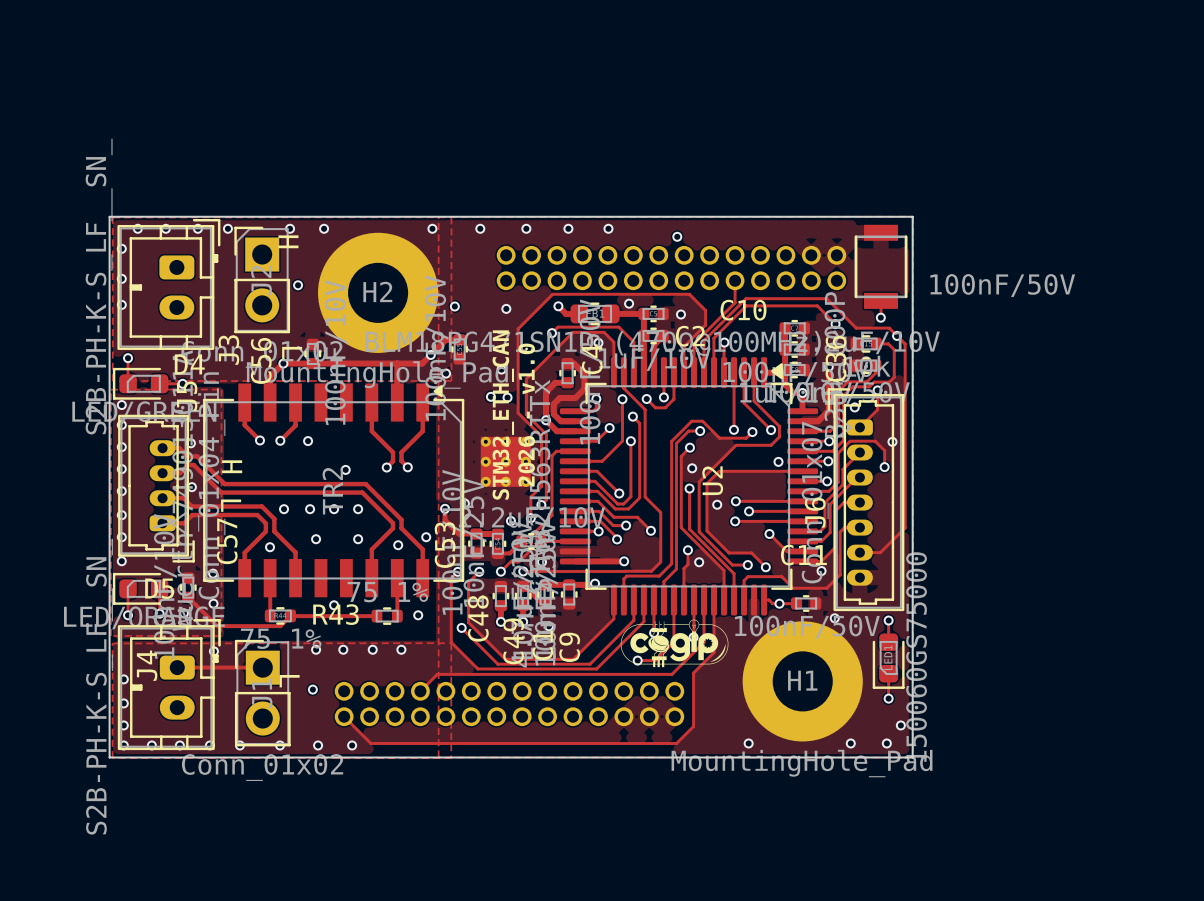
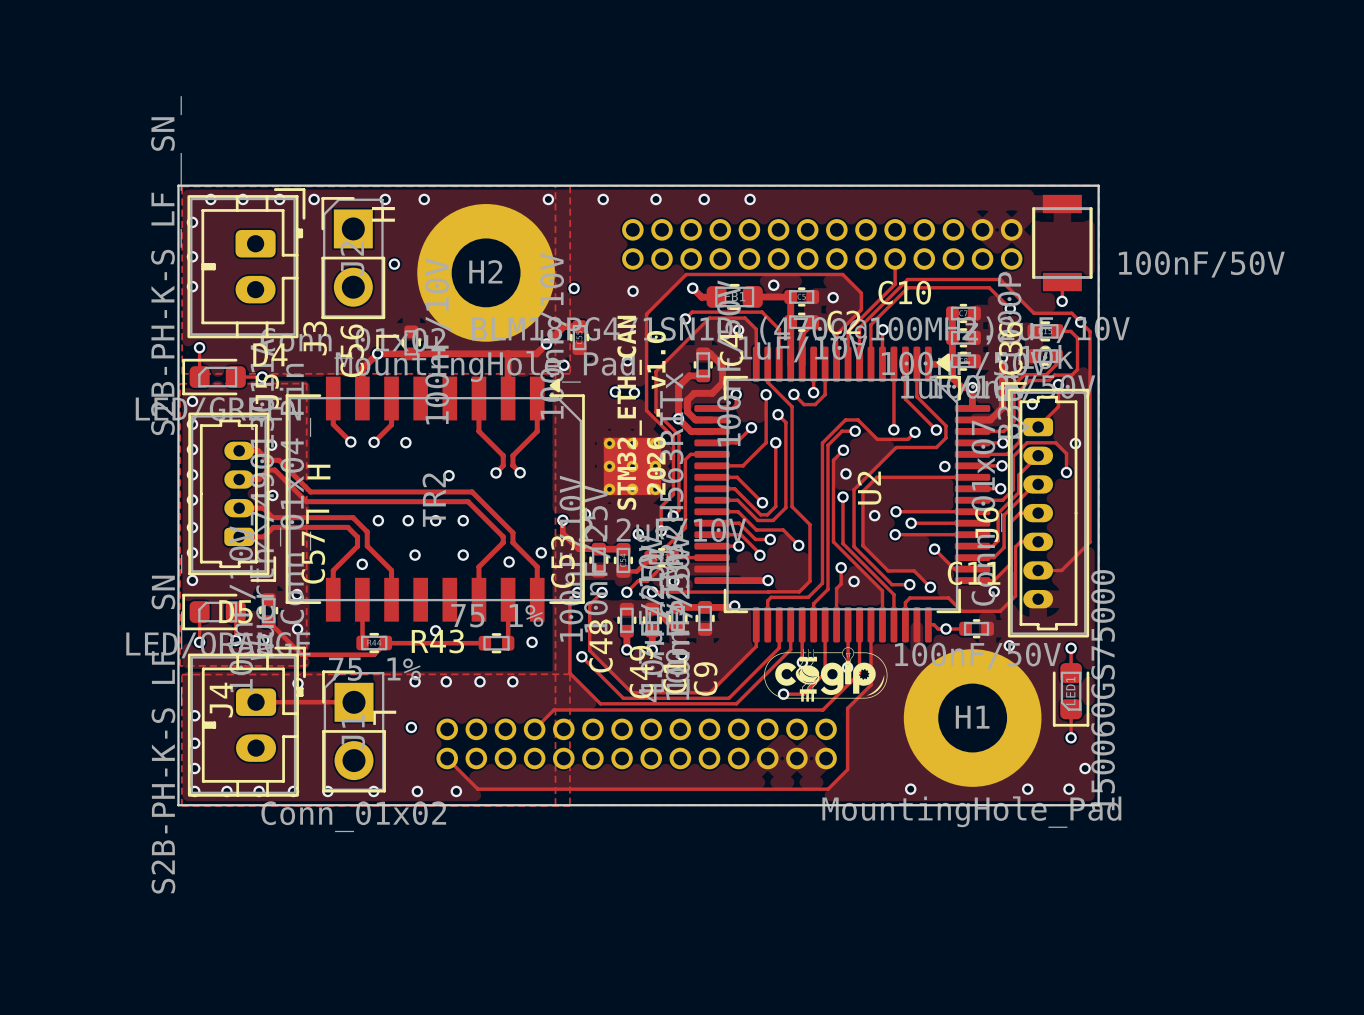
via: (677, 236) -> none

